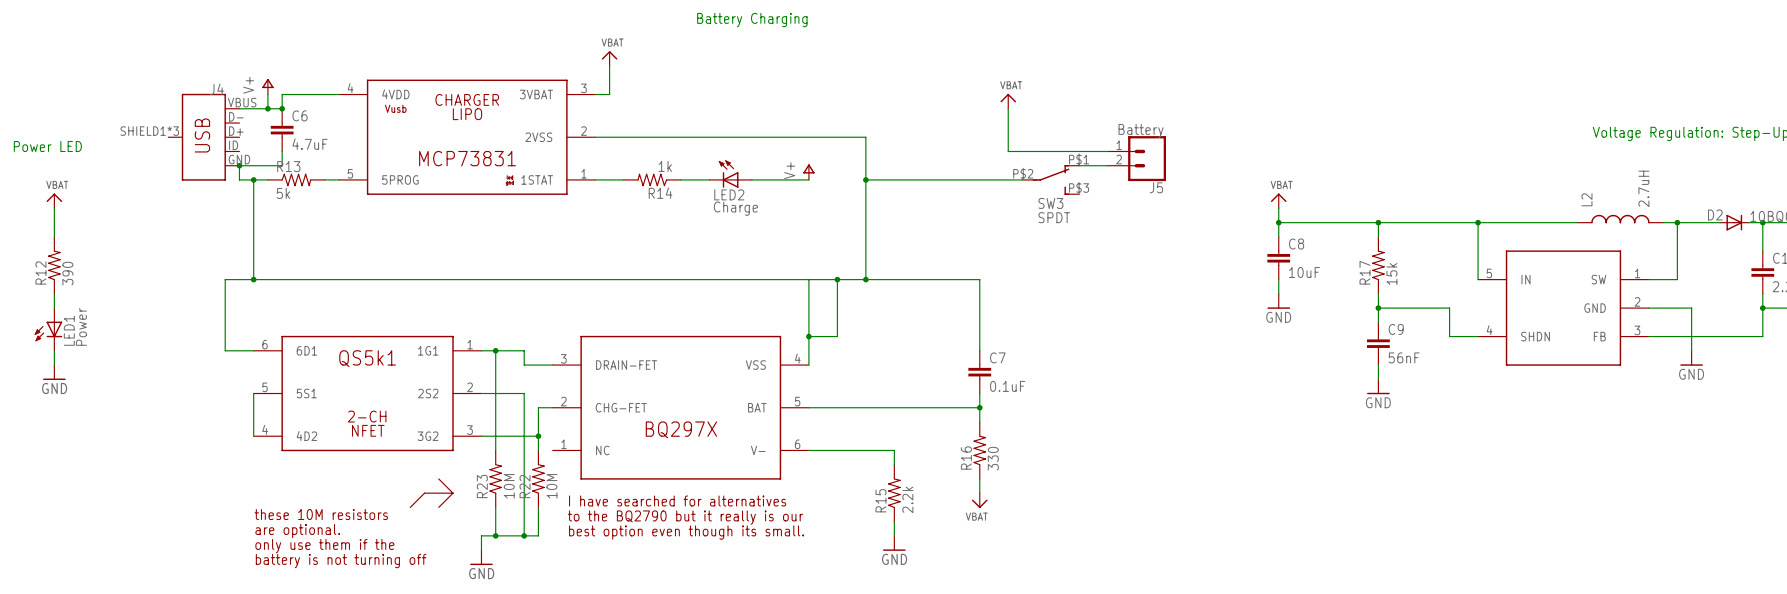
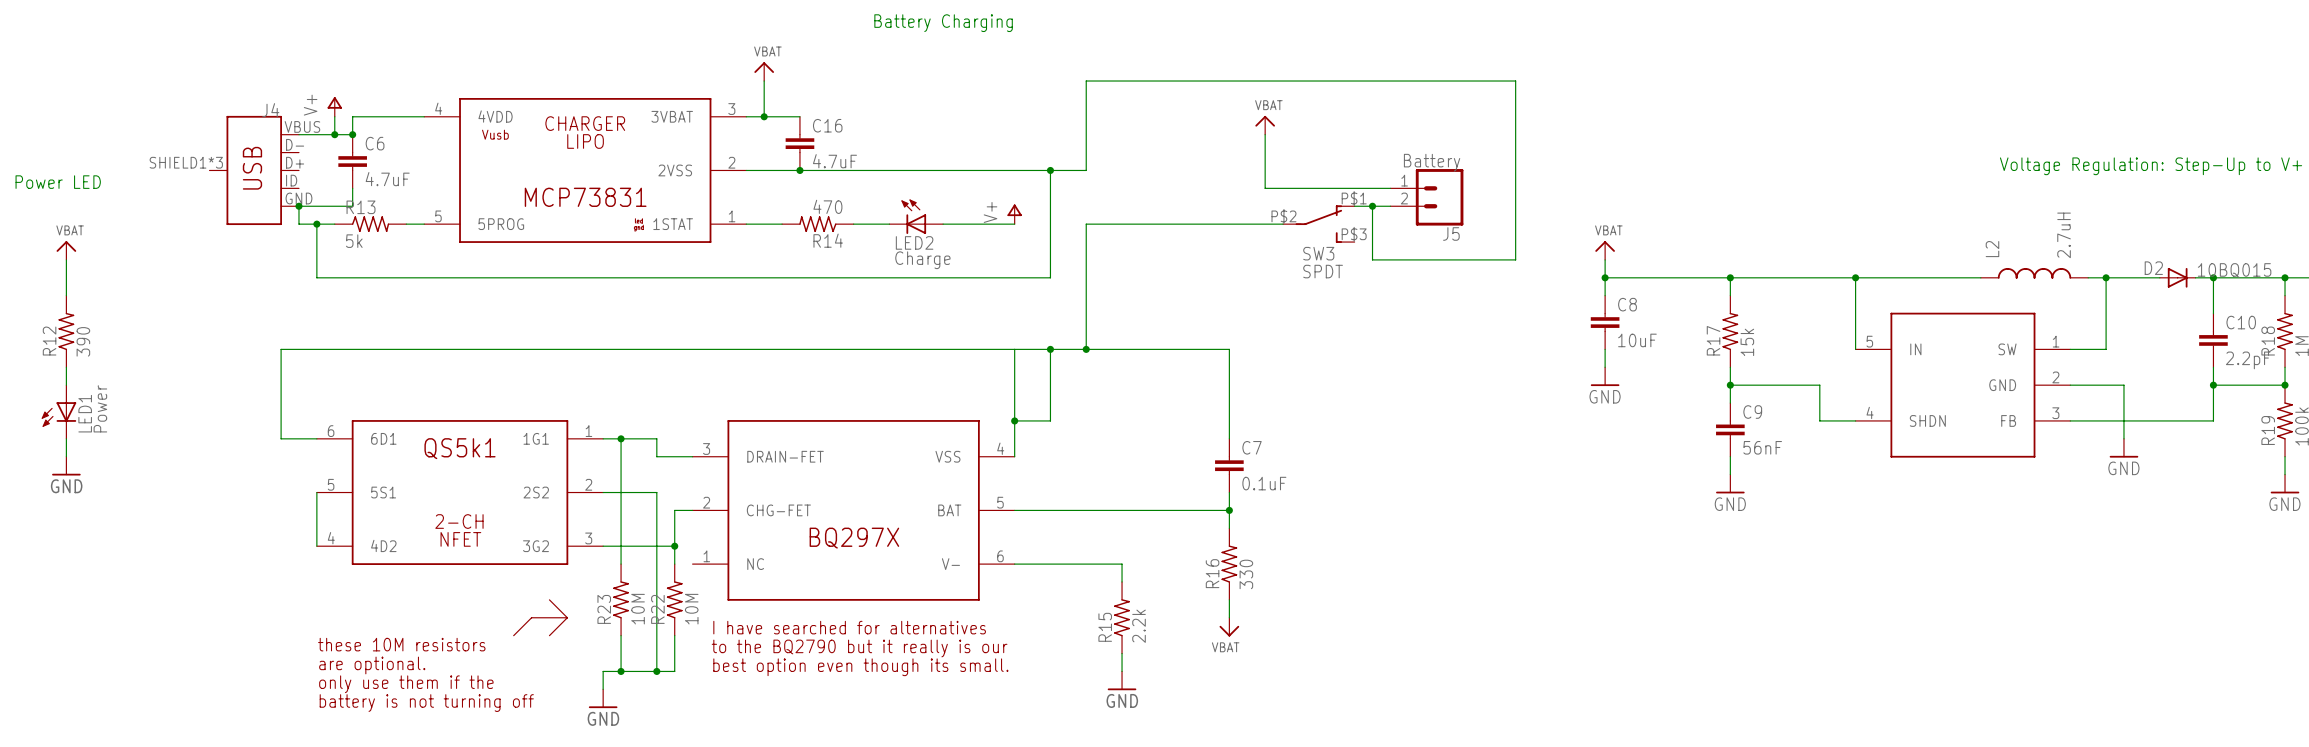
wire: none -> (764, 116) (799, 116)
junction: none -> (764, 116)
C16: none -> 4.7uF (799, 143)
junction: none -> (799, 170)
junction: none -> (1050, 170)
wire: (865, 137) (865, 179) -> (1086, 170) (1086, 81) (1515, 81) (1515, 259) (1372, 259) (1372, 206)
junction: none -> (1372, 206)
R14 value: 1k (665, 166) -> 470 (827, 206)
junction: (865, 179) -> none
wire: (253, 222) (253, 279) -> (316, 277) (1050, 277) (1050, 170)
junction: (253, 279) -> none

